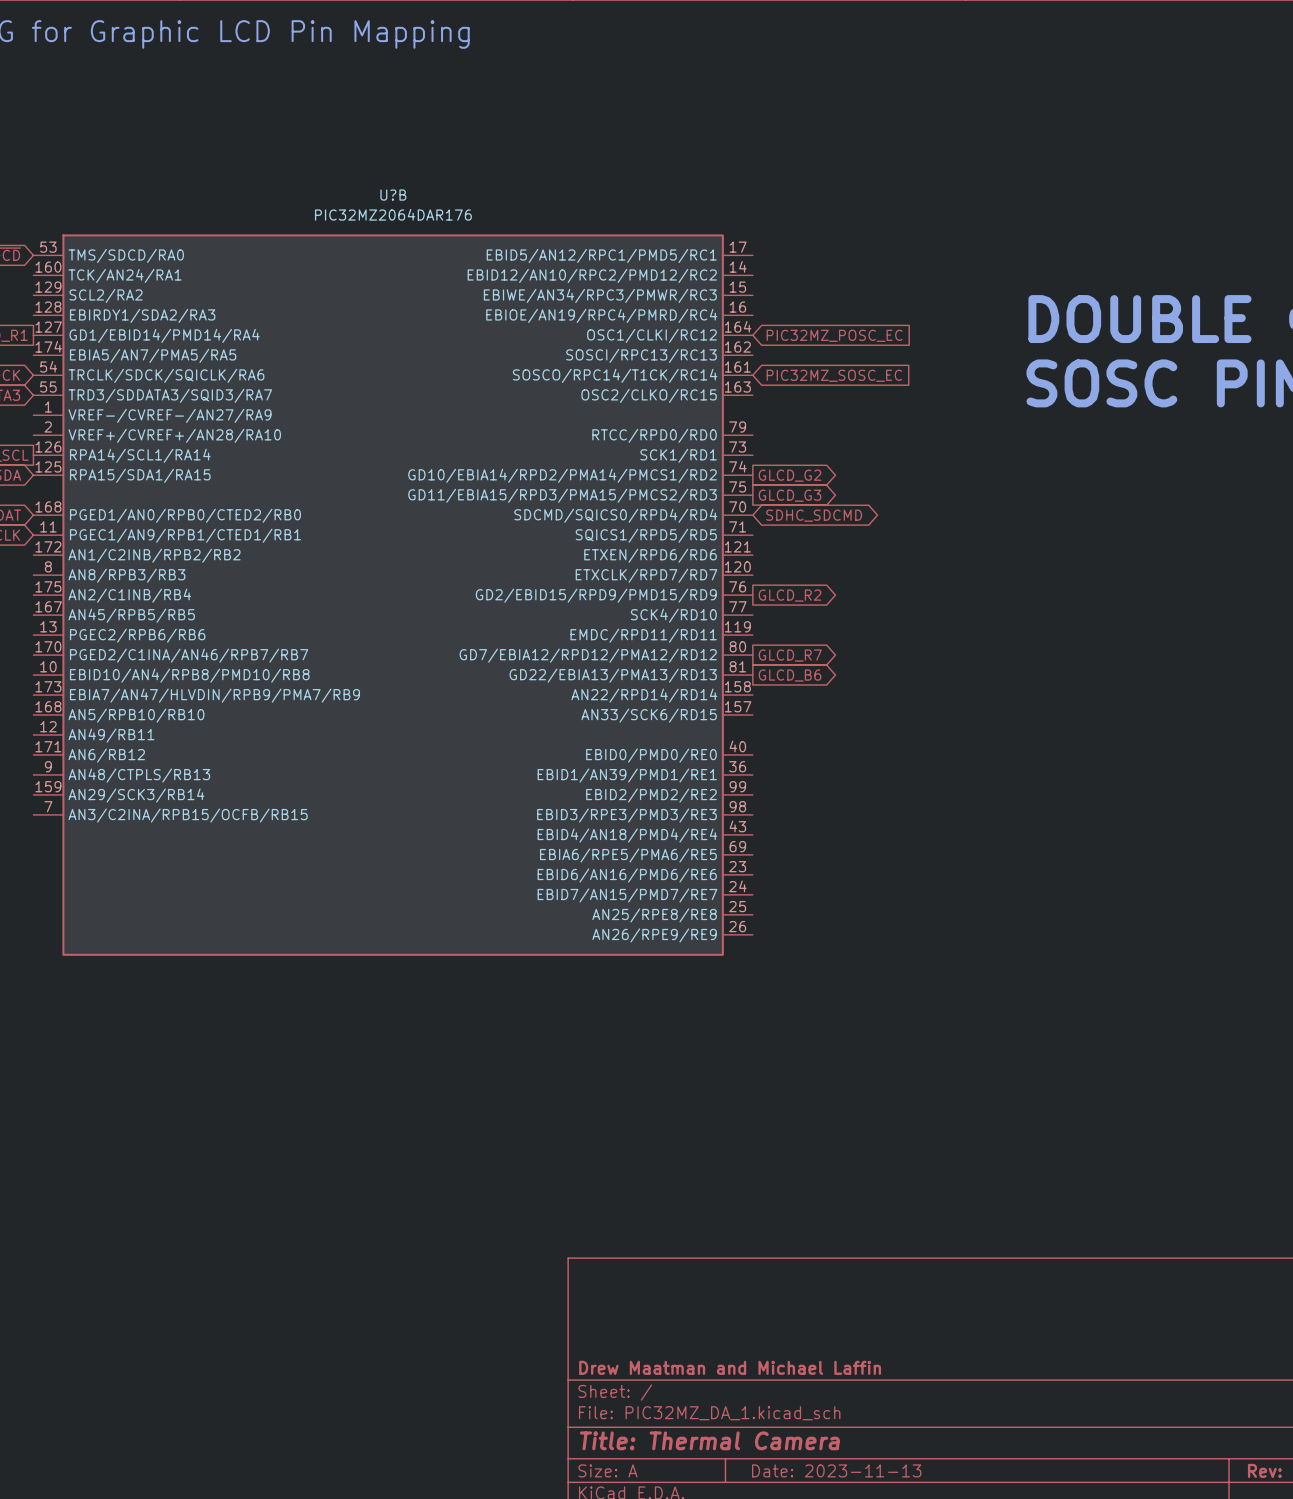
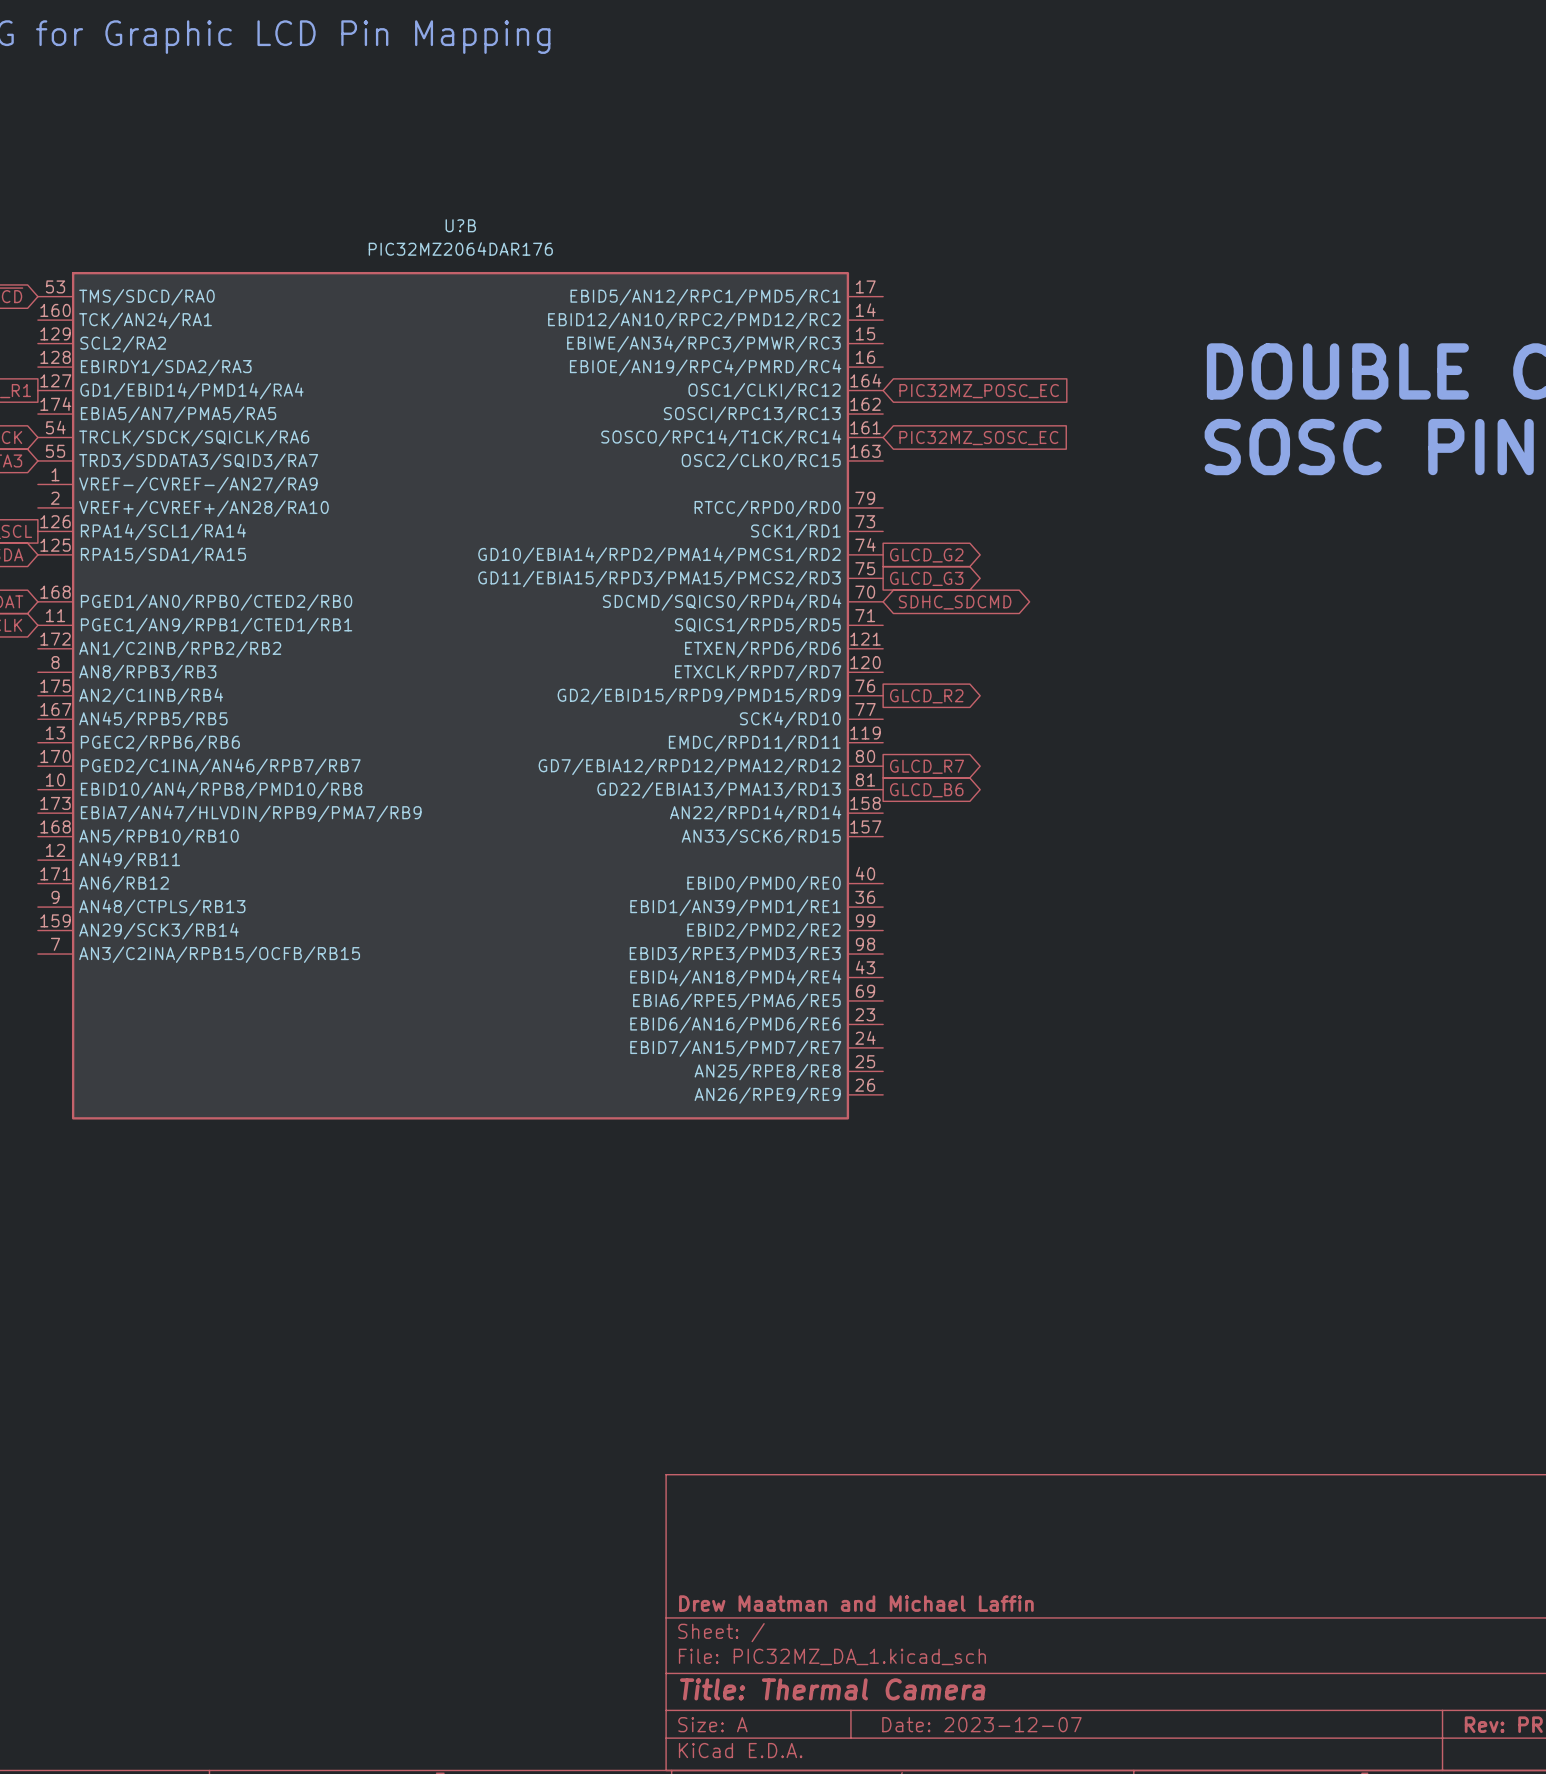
title block: Date: 2023-11-13 (836, 1470) -> Date: 2023-12-07 (981, 1724)

